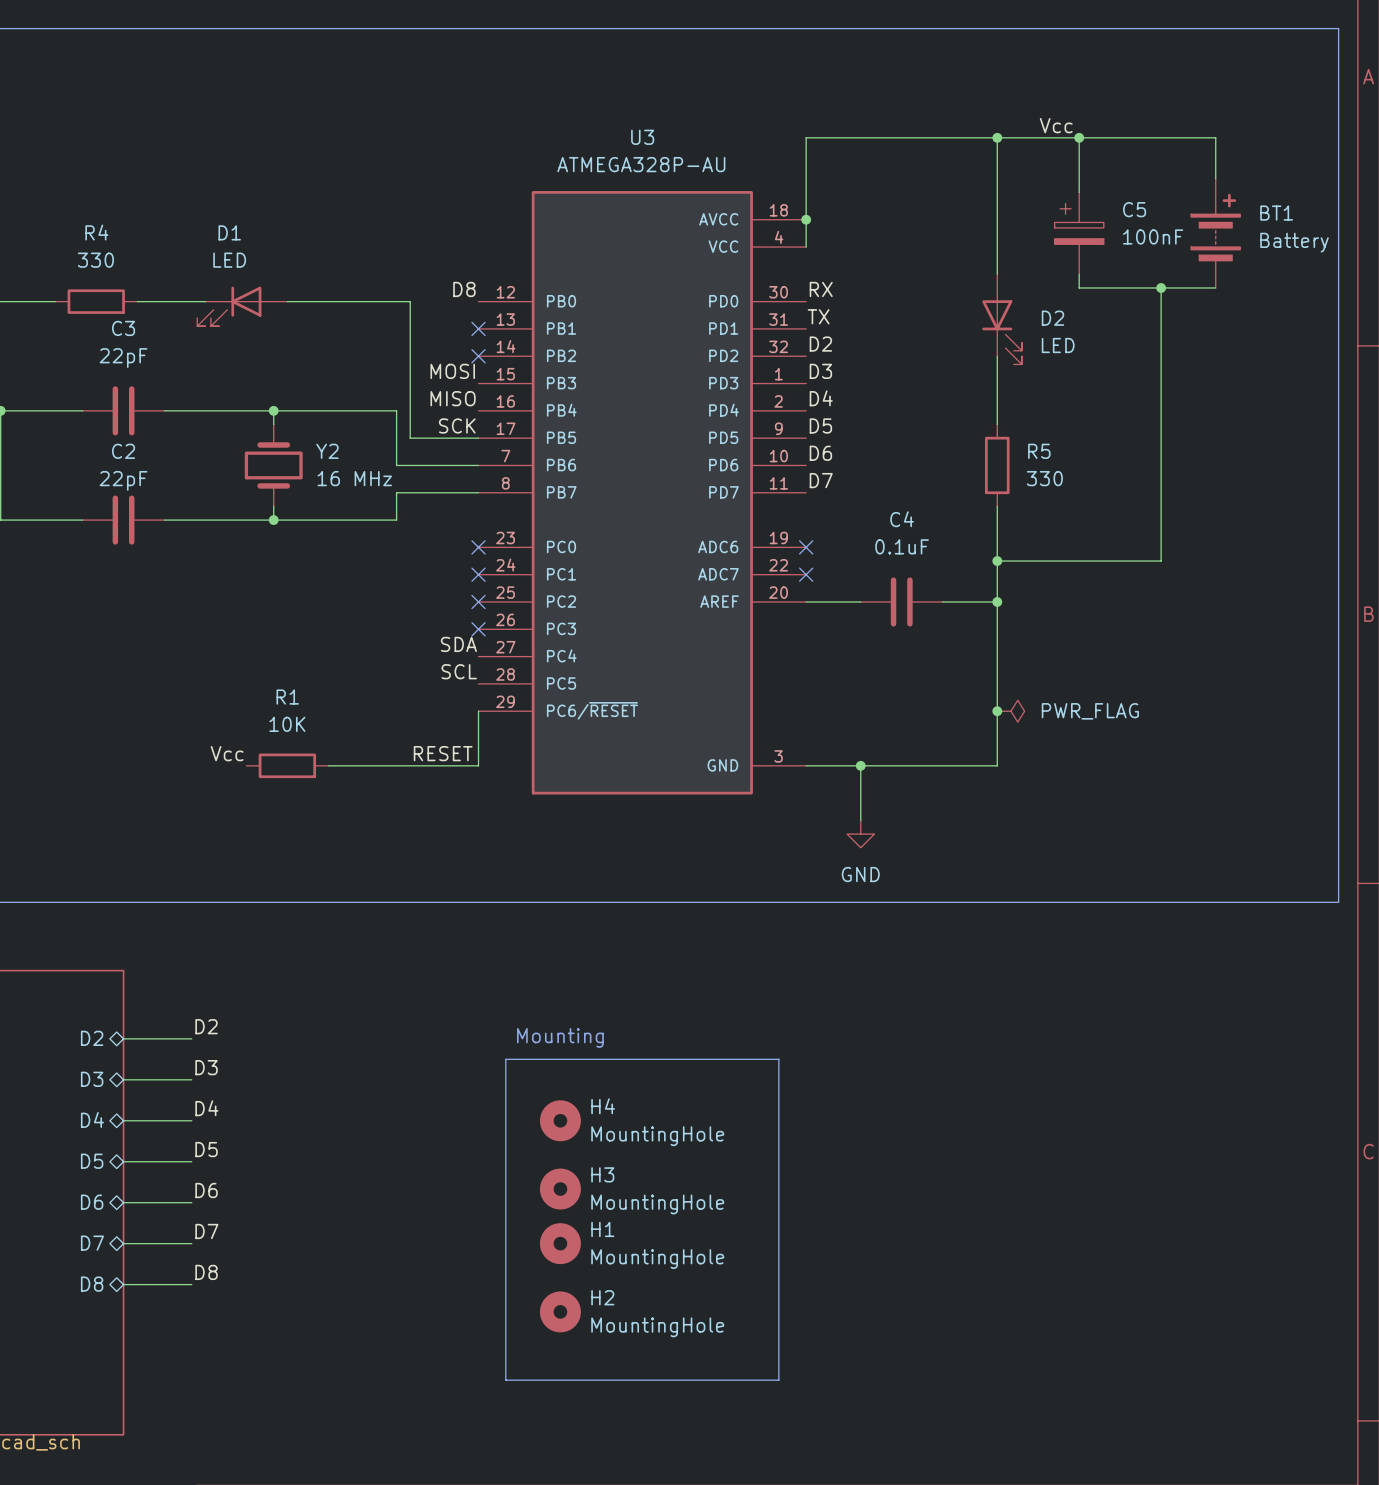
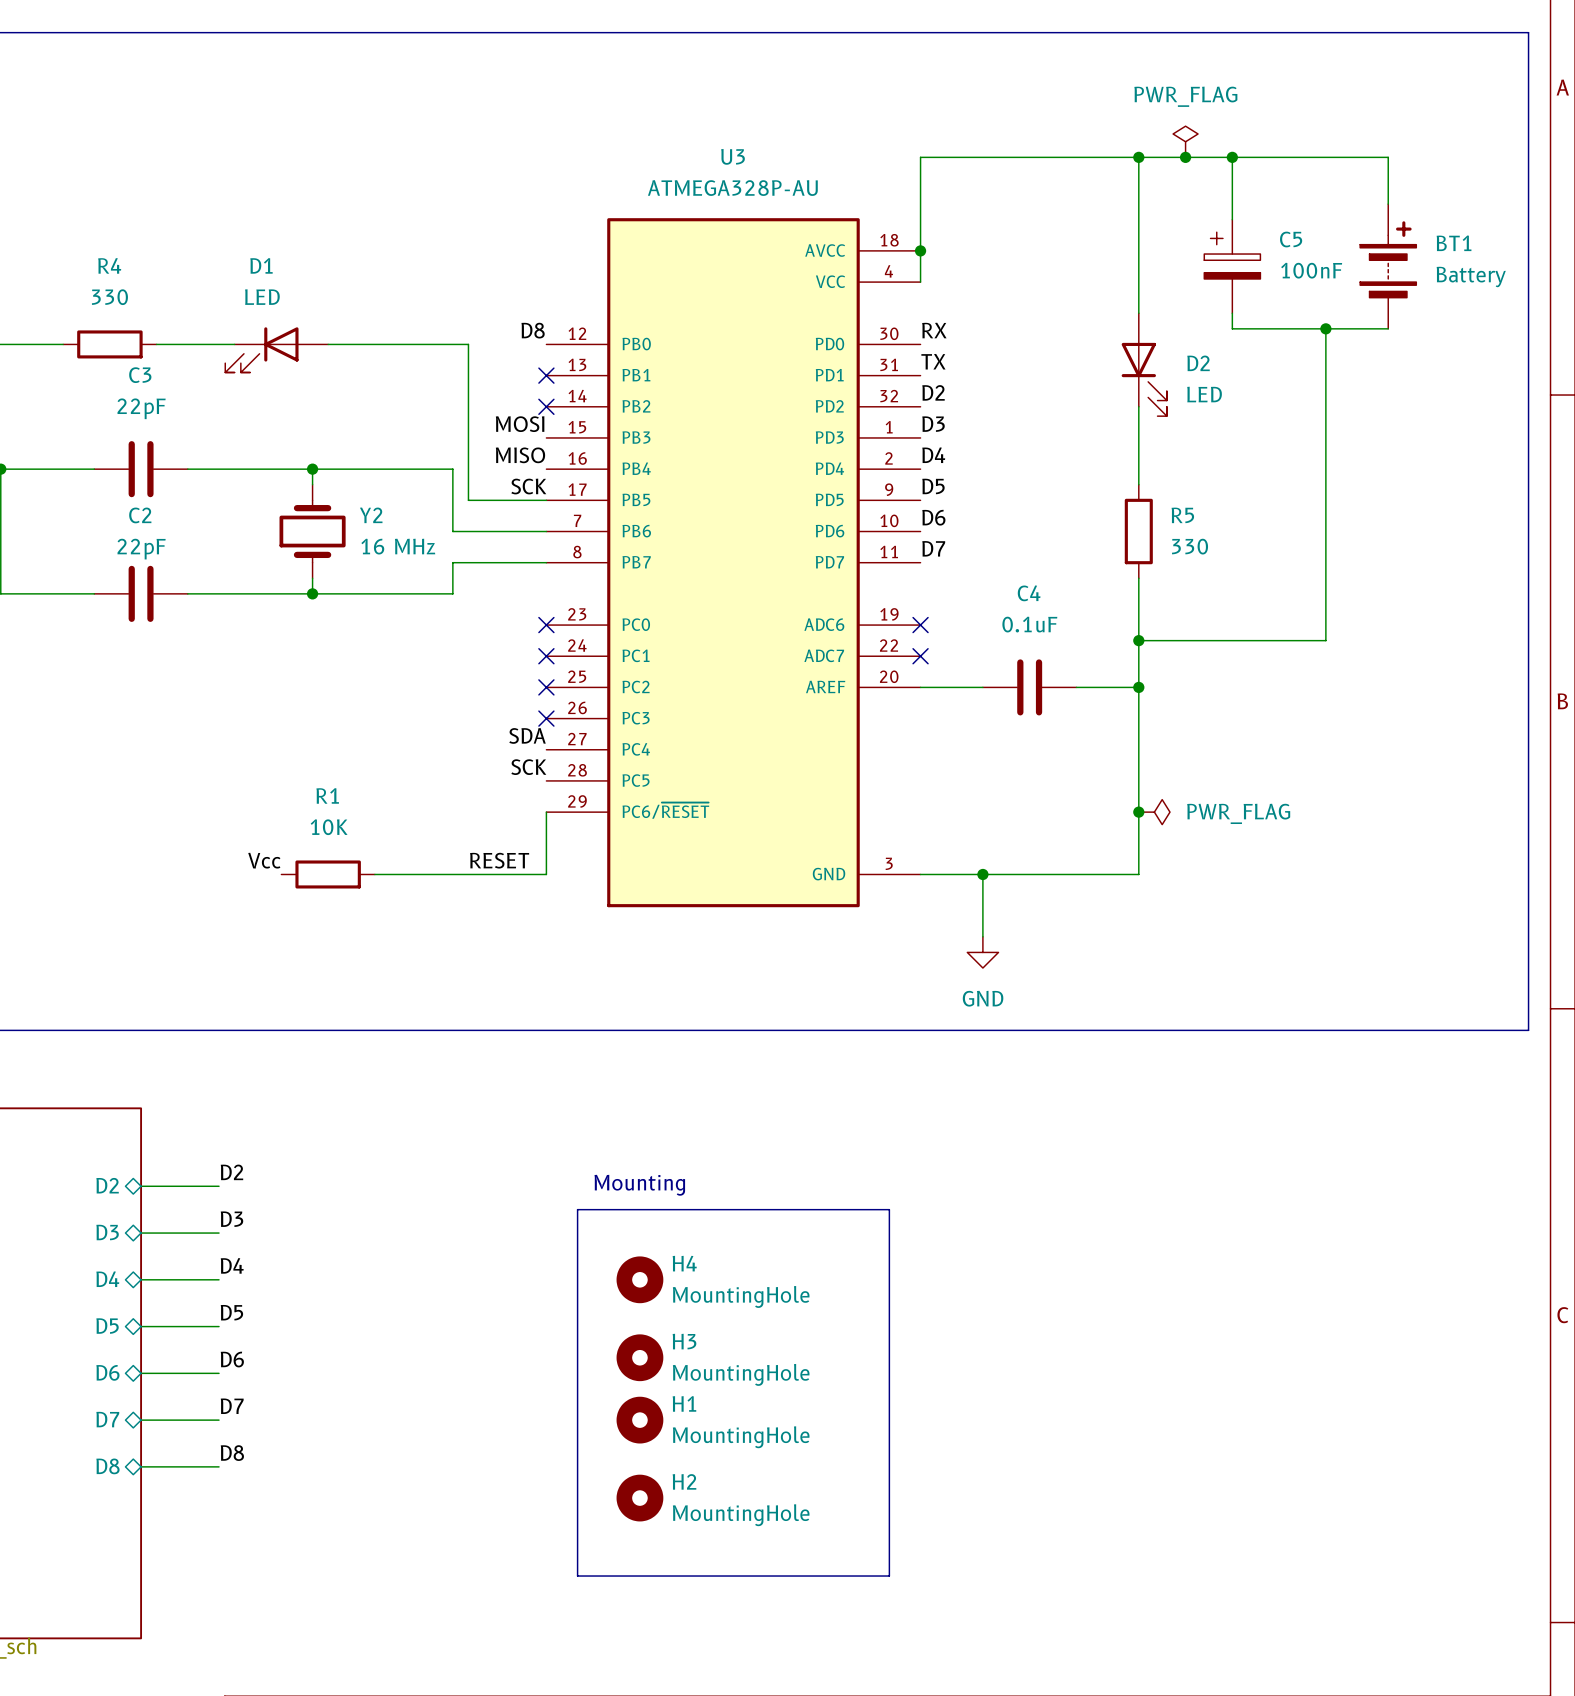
power symbol: none -> PWR_FLAG (1185, 141)
label: Vcc (1056, 125) -> none
junction: none -> (1185, 157)
label: SCL (459, 671) -> SCK (528, 767)

